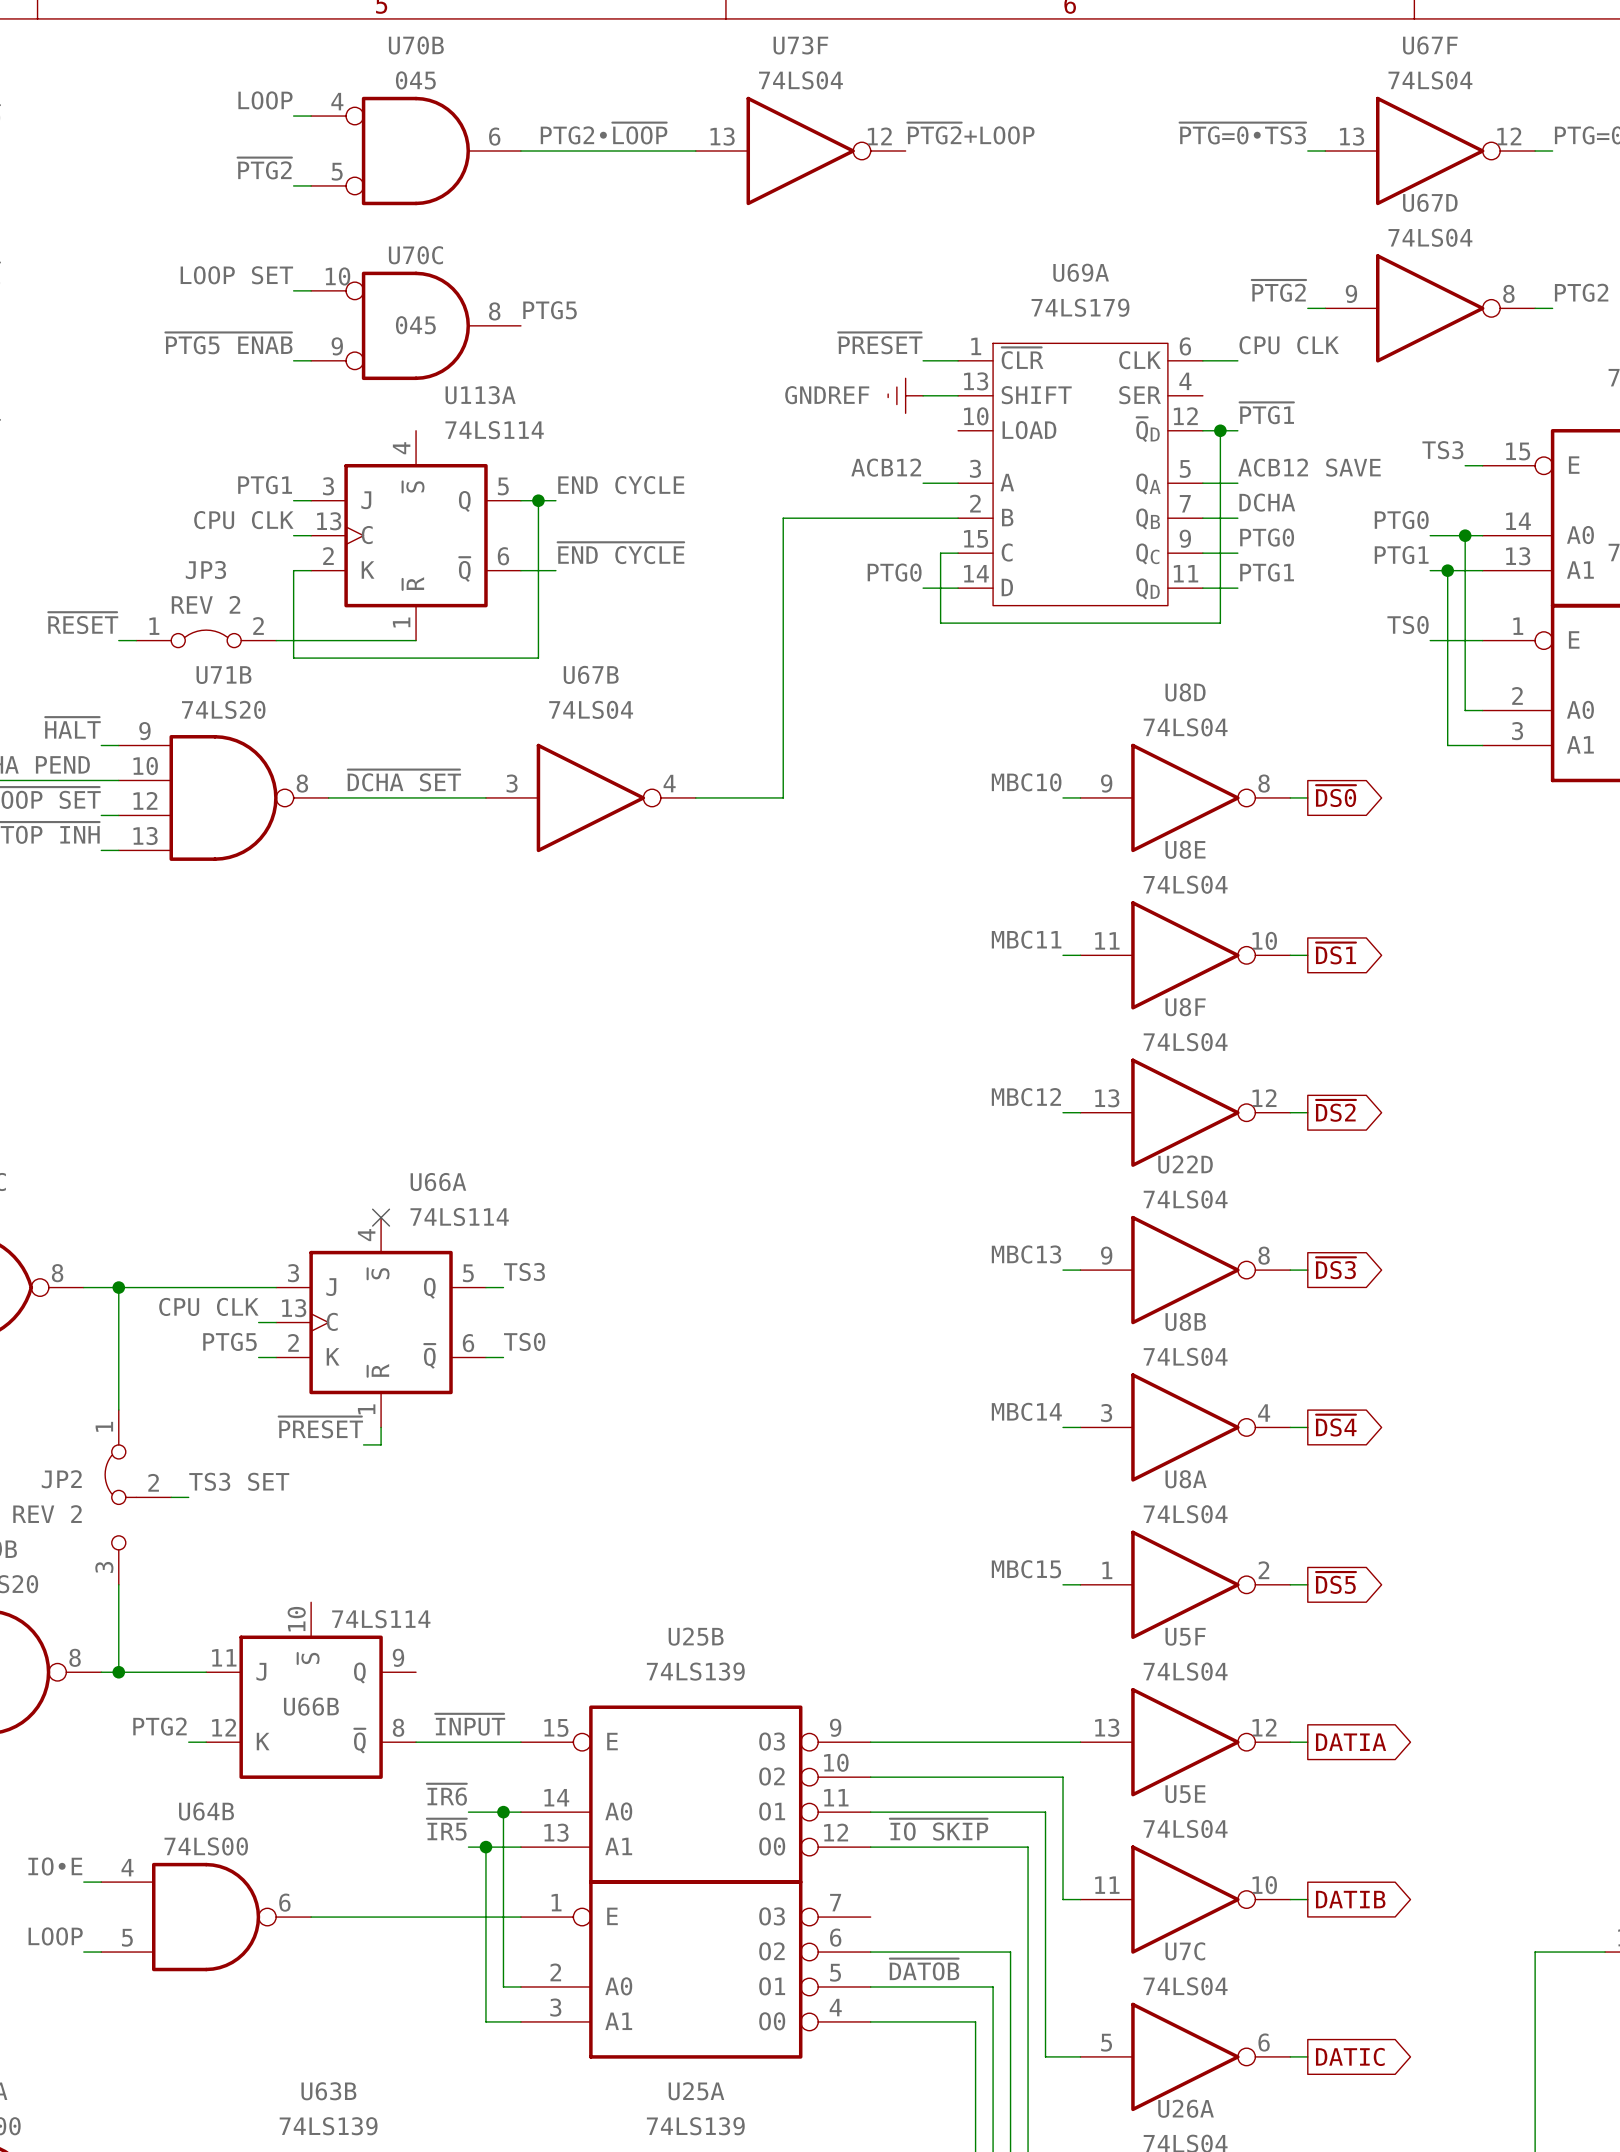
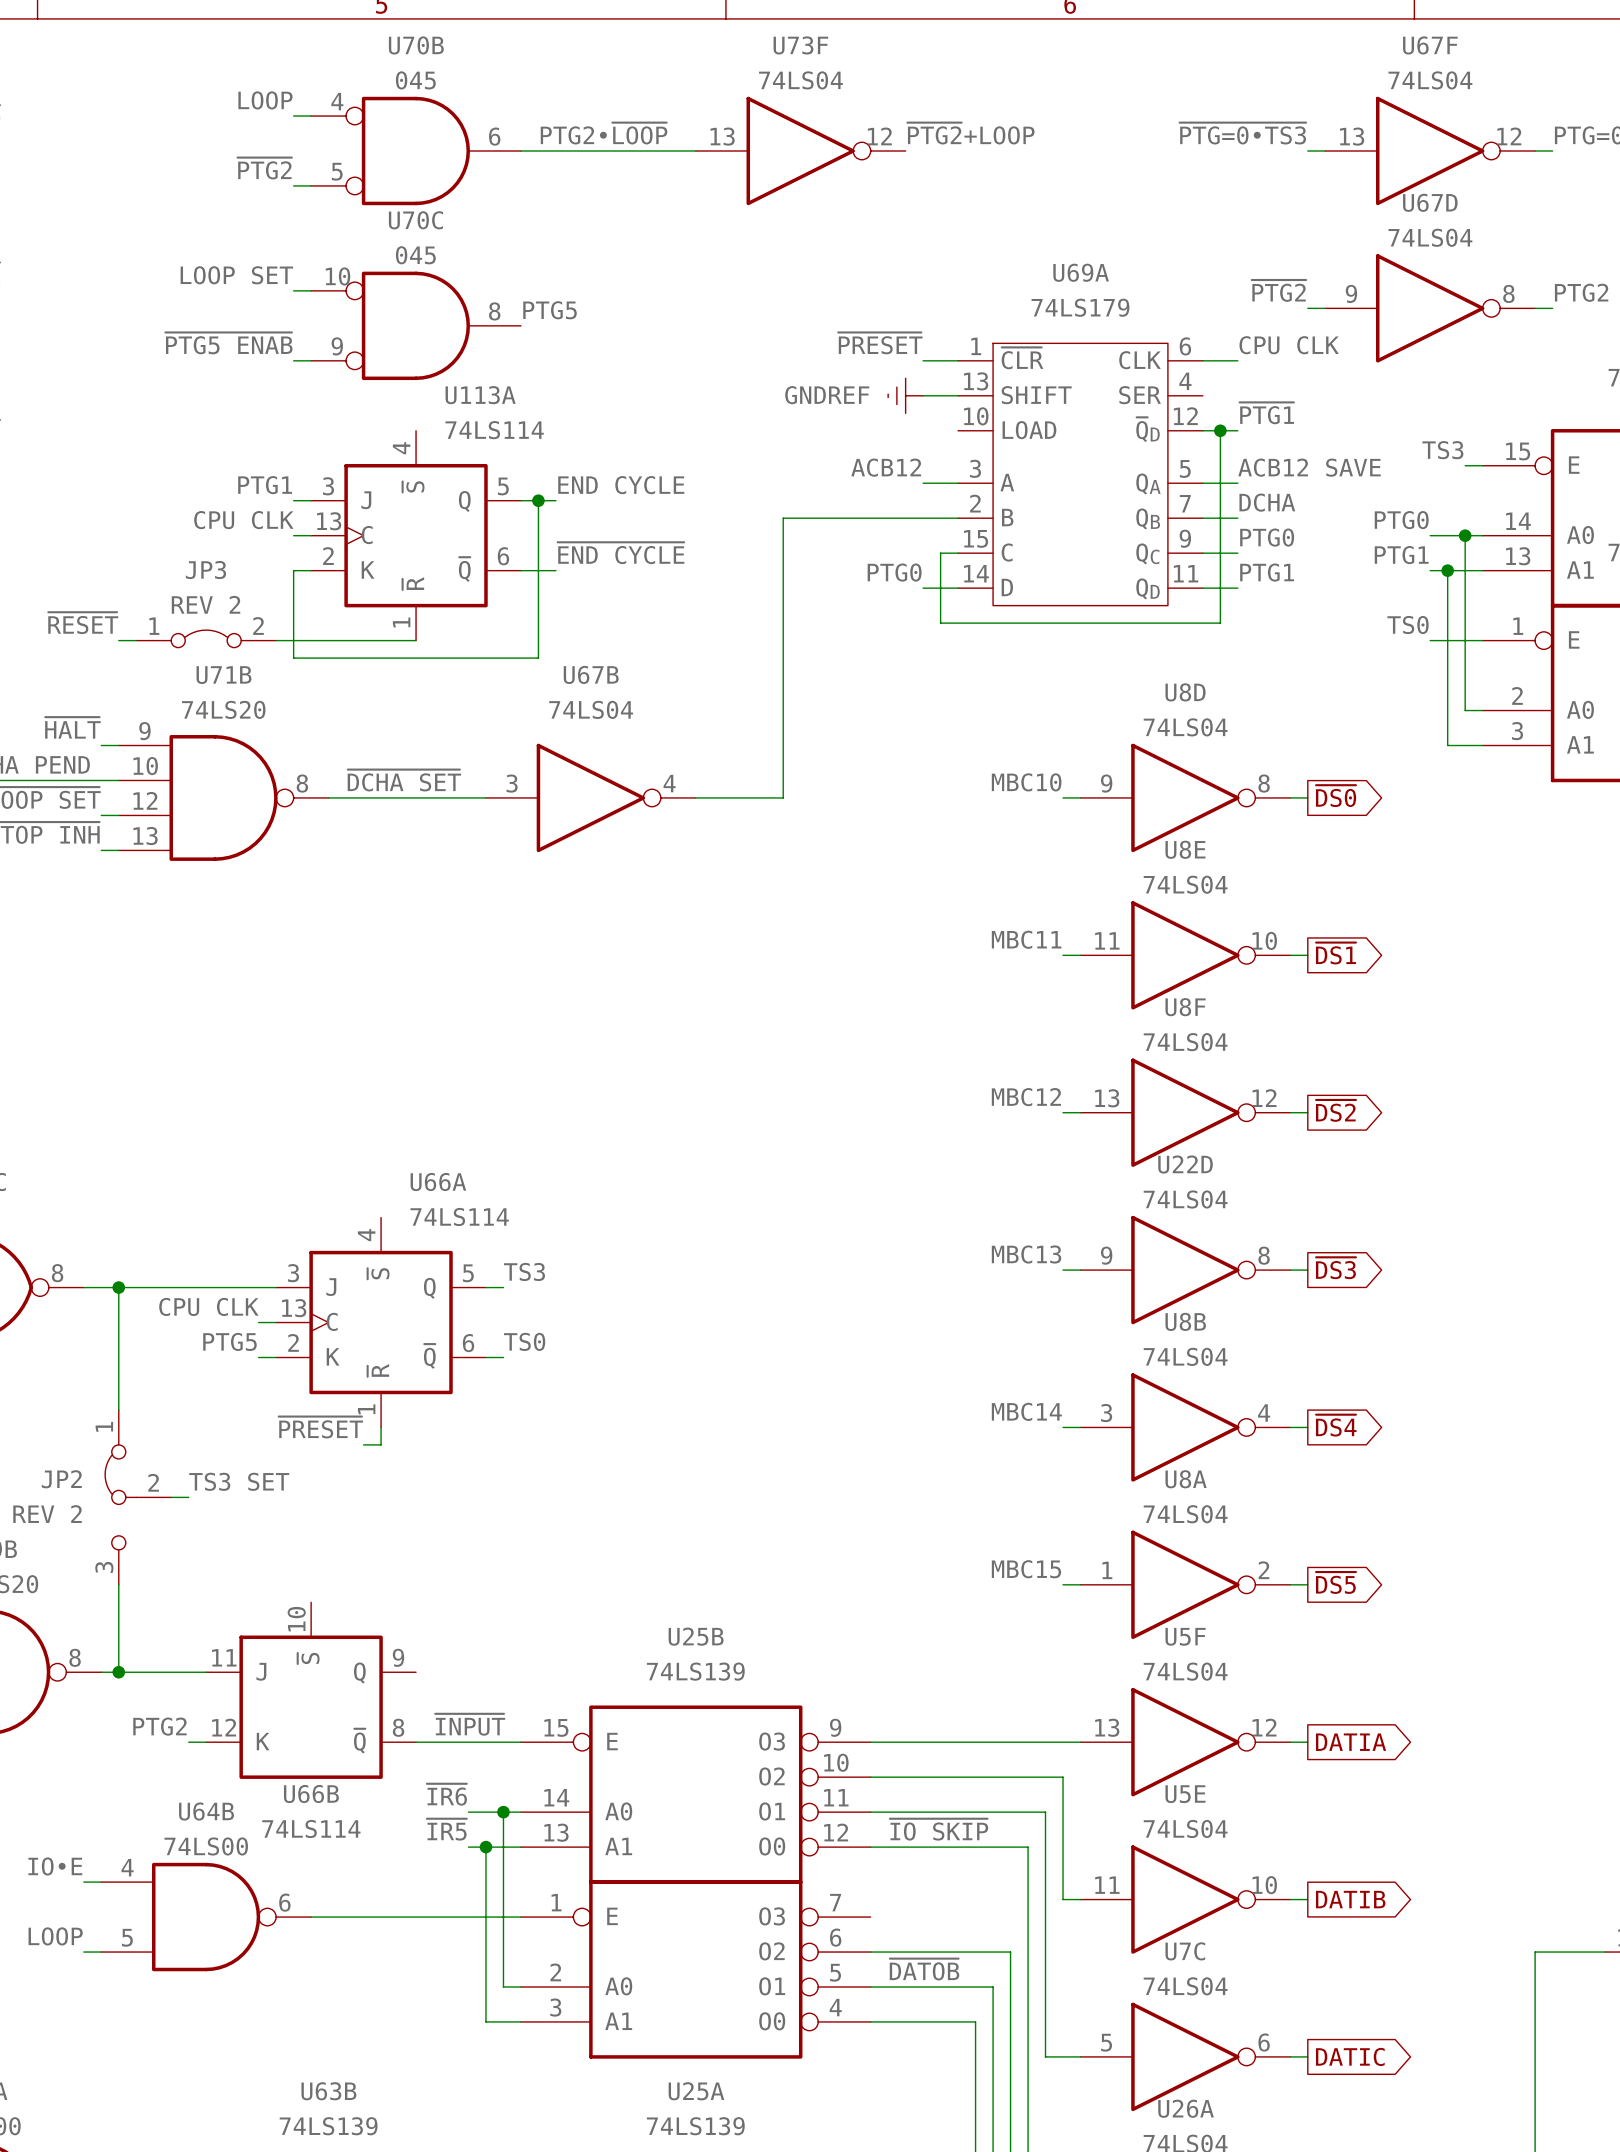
U70C name position: U70C (415, 255) -> U70C (415, 220)
U70C value position: 045 (415, 325) -> 045 (415, 255)
no-connect mark: (381, 1217) -> none
U66B value position: 74LS114 (381, 1619) -> 74LS114 (311, 1828)
U66B name position: U66B (311, 1706) -> U66B (311, 1794)

